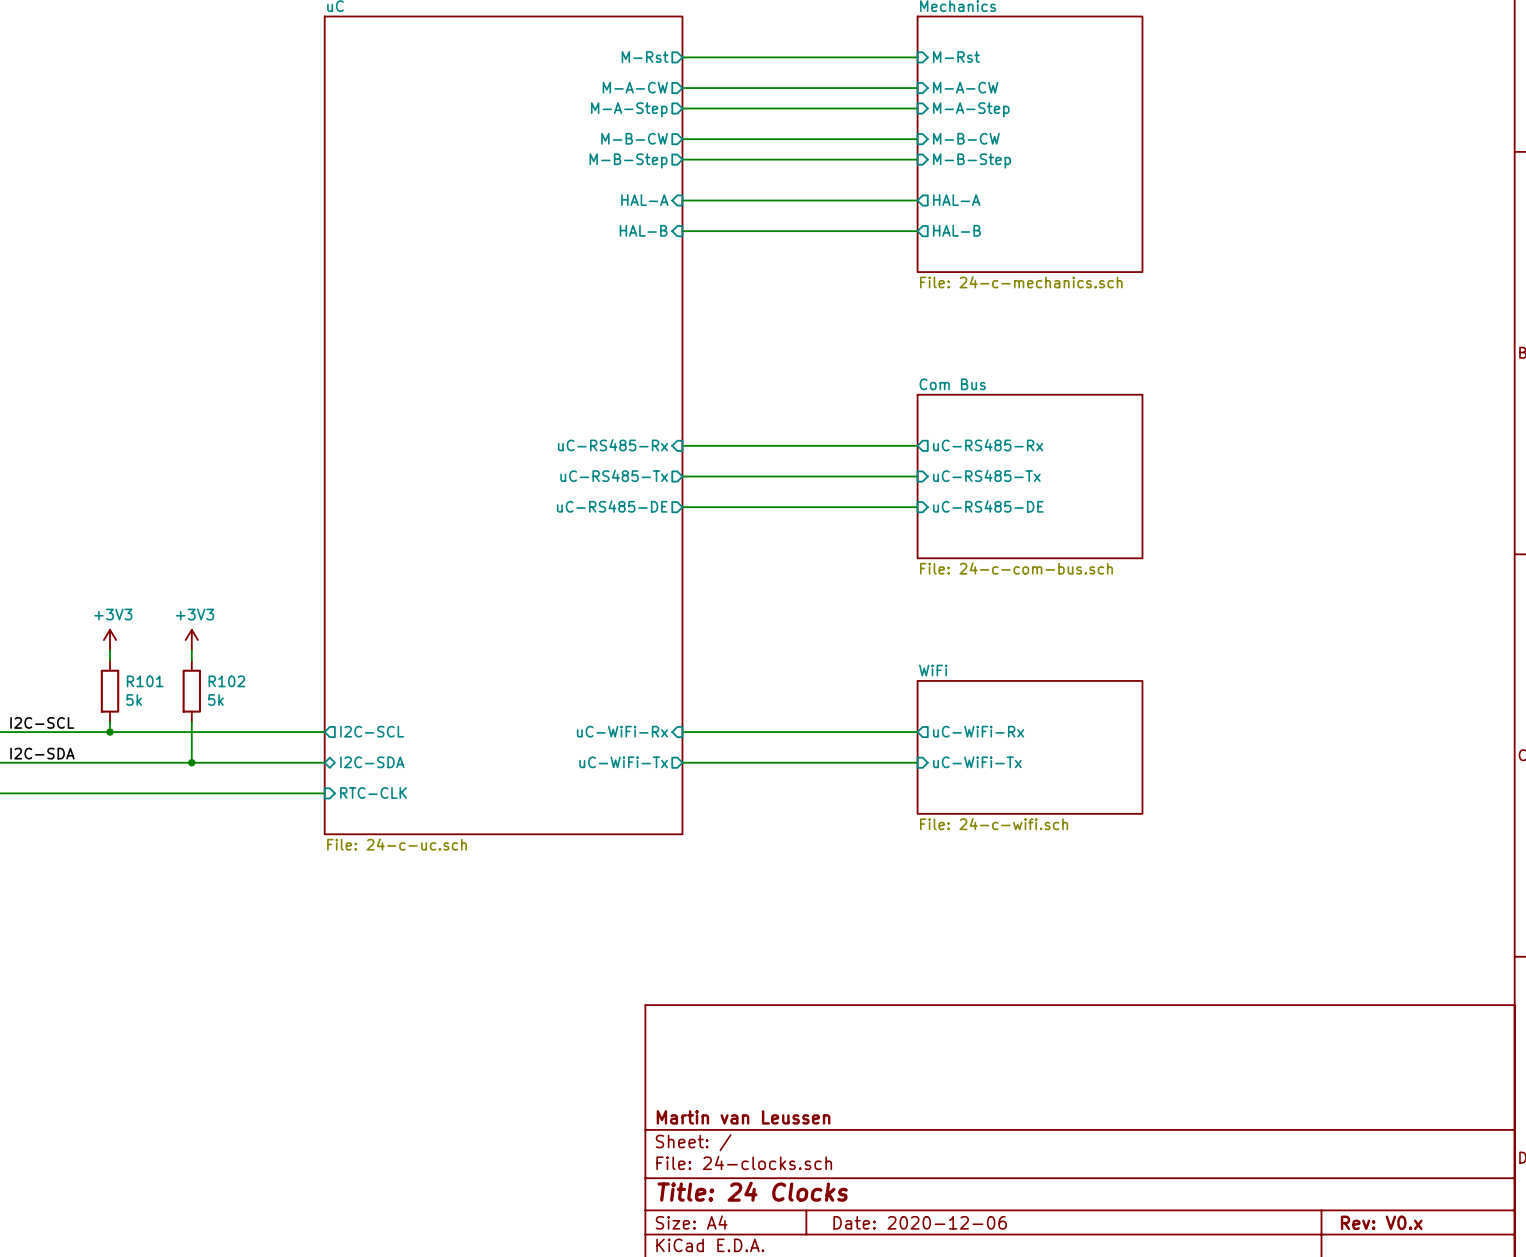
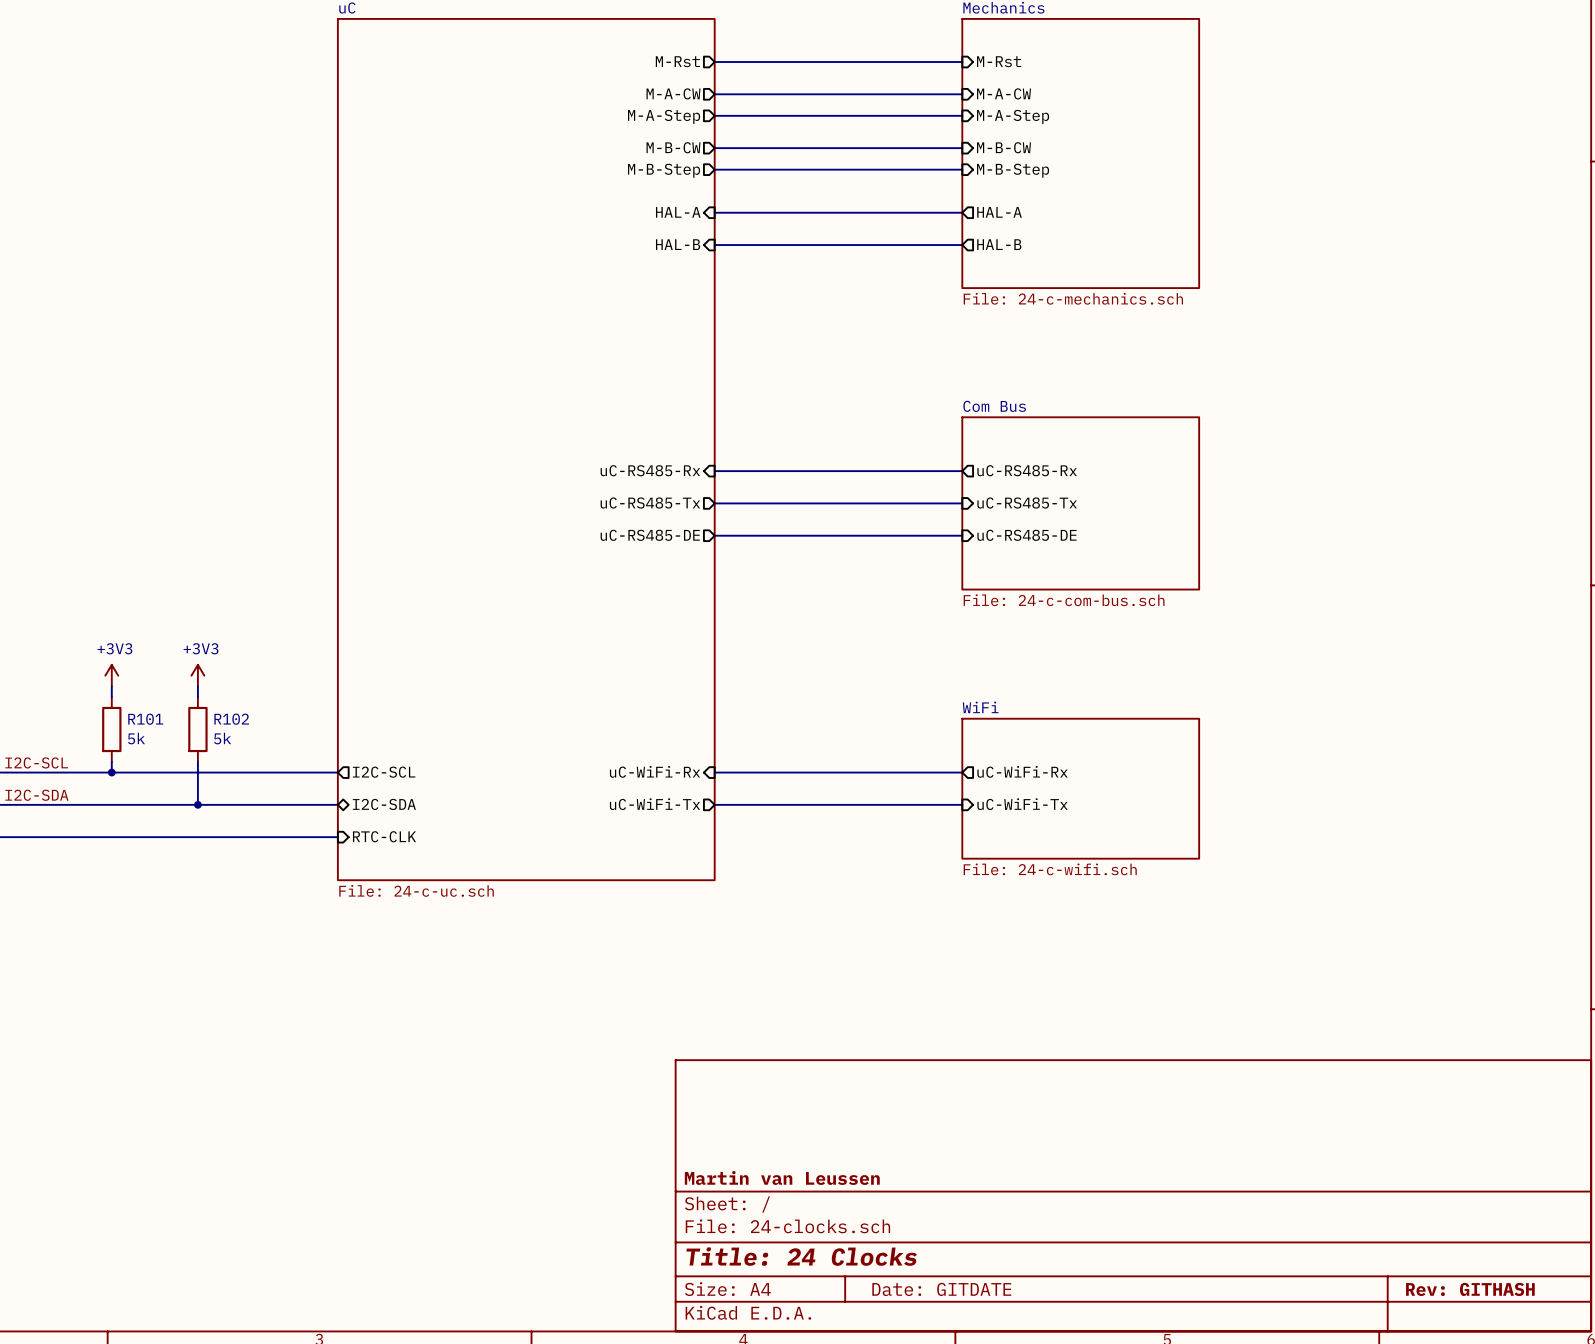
title block: Date: 2020-12-06 (920, 1222) -> Date: GITDATE (941, 1289)
title block: Rev: V0.x (1381, 1222) -> Rev: GITHASH (1470, 1289)

